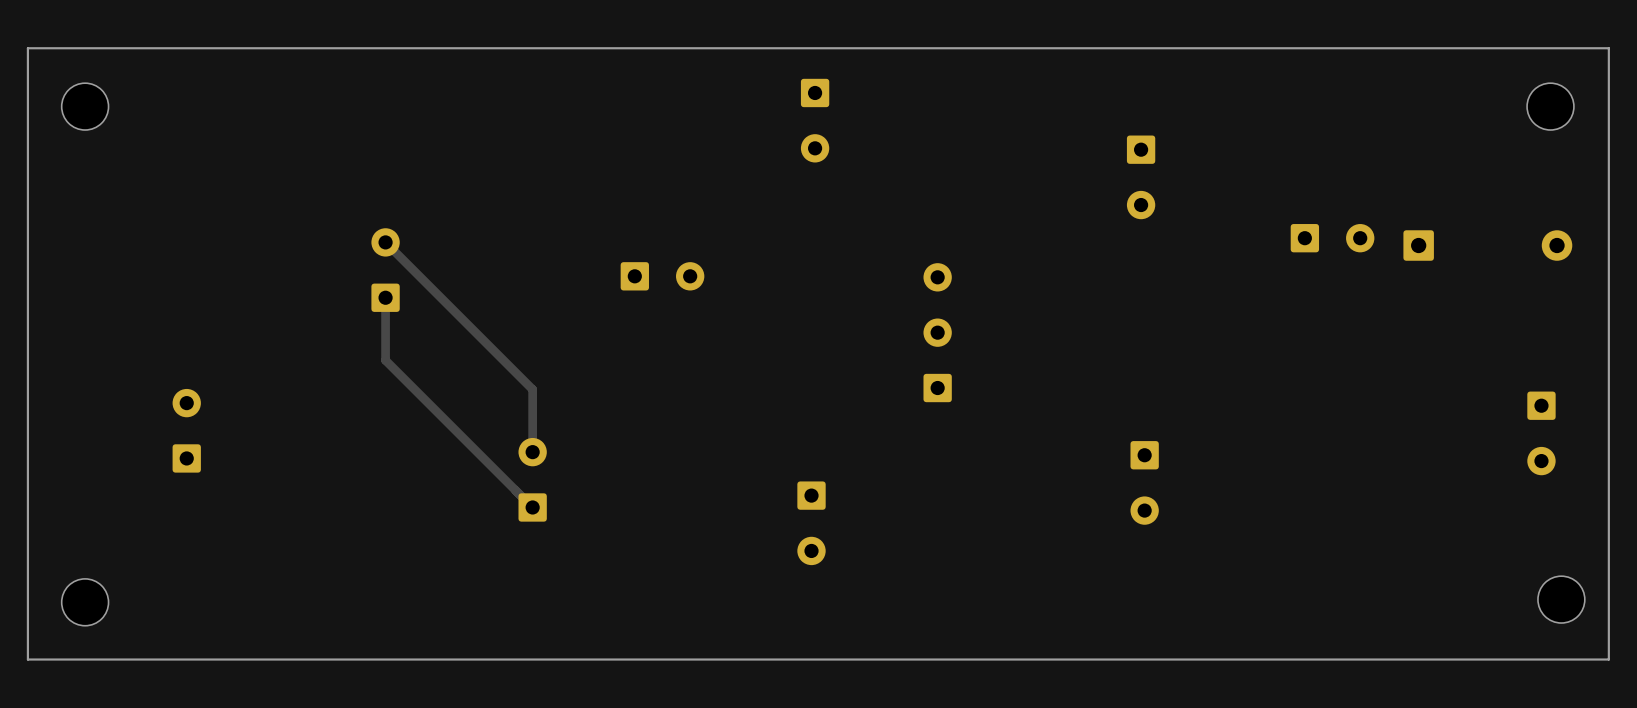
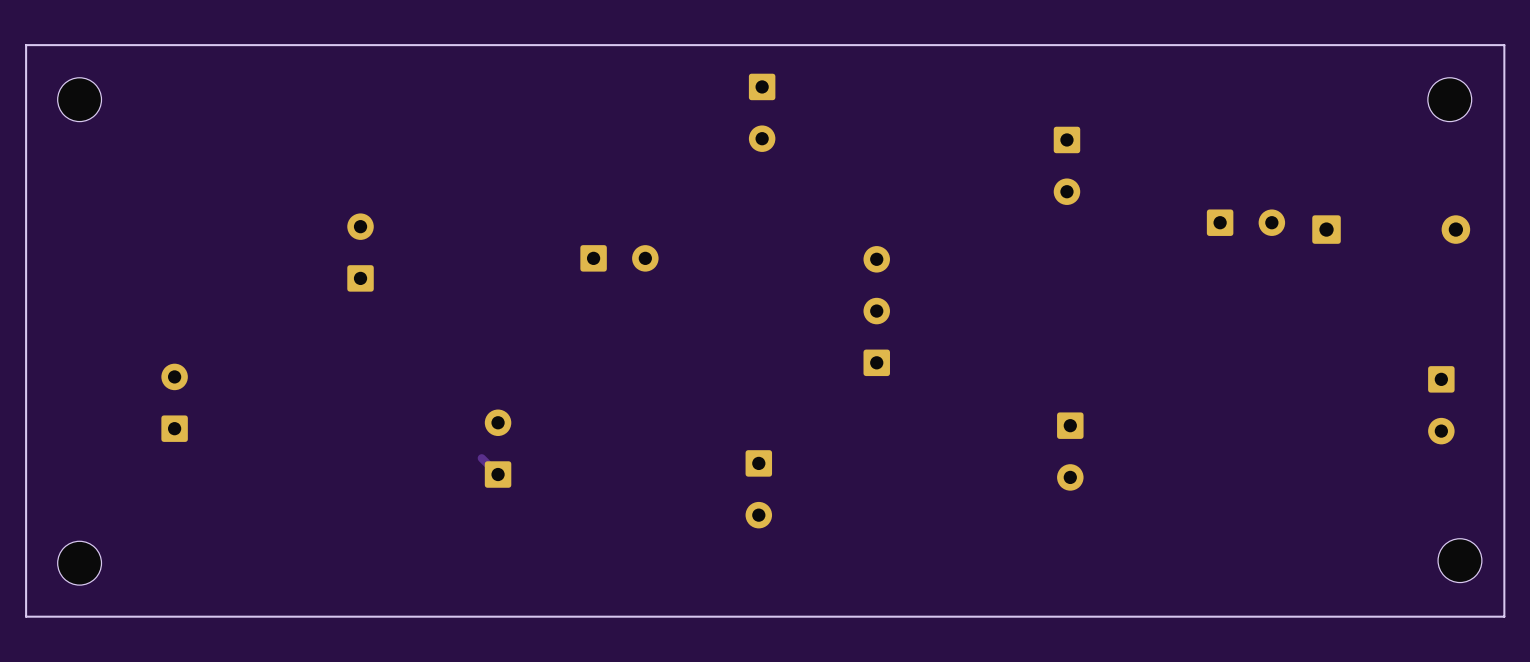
track: (385, 242) (532, 389) (532, 452) -> none
track: (385, 297) (385, 360) (515, 490) -> none

